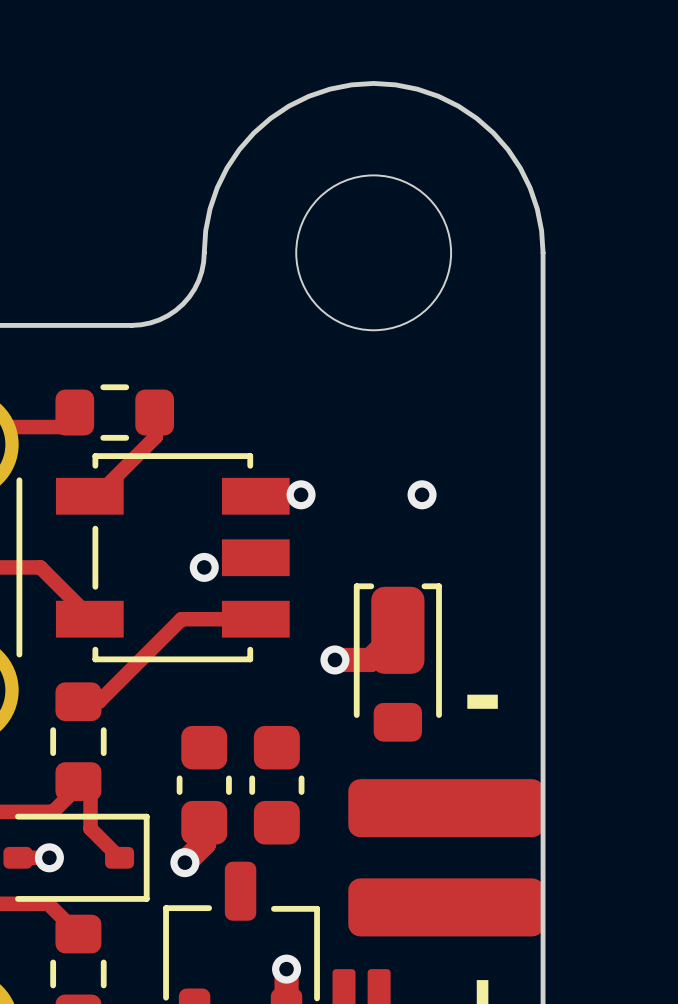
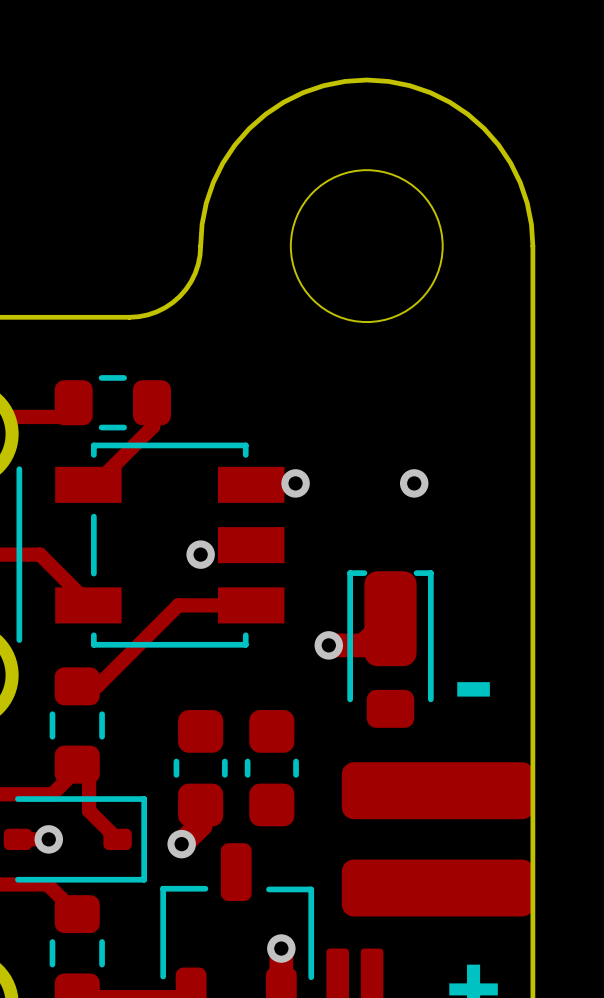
part footprint: [353, 583, 442, 742] -> [347, 570, 434, 728]

